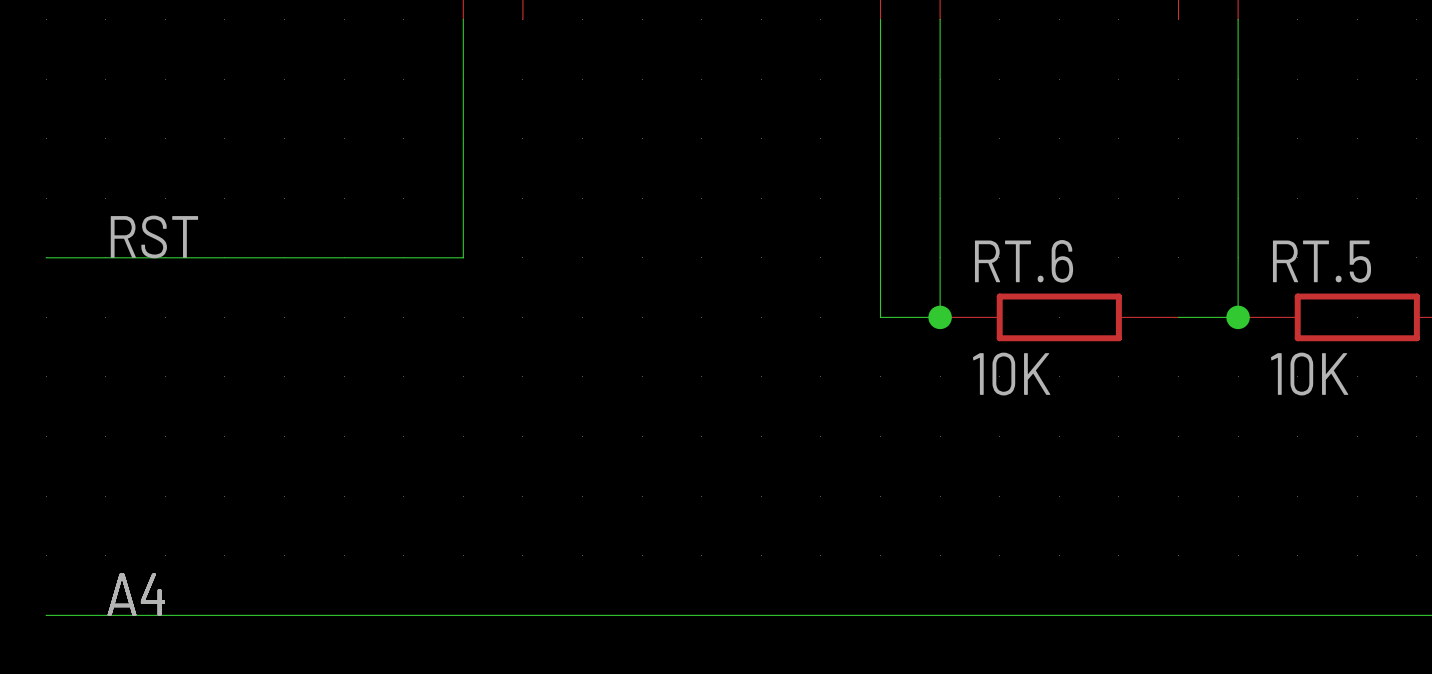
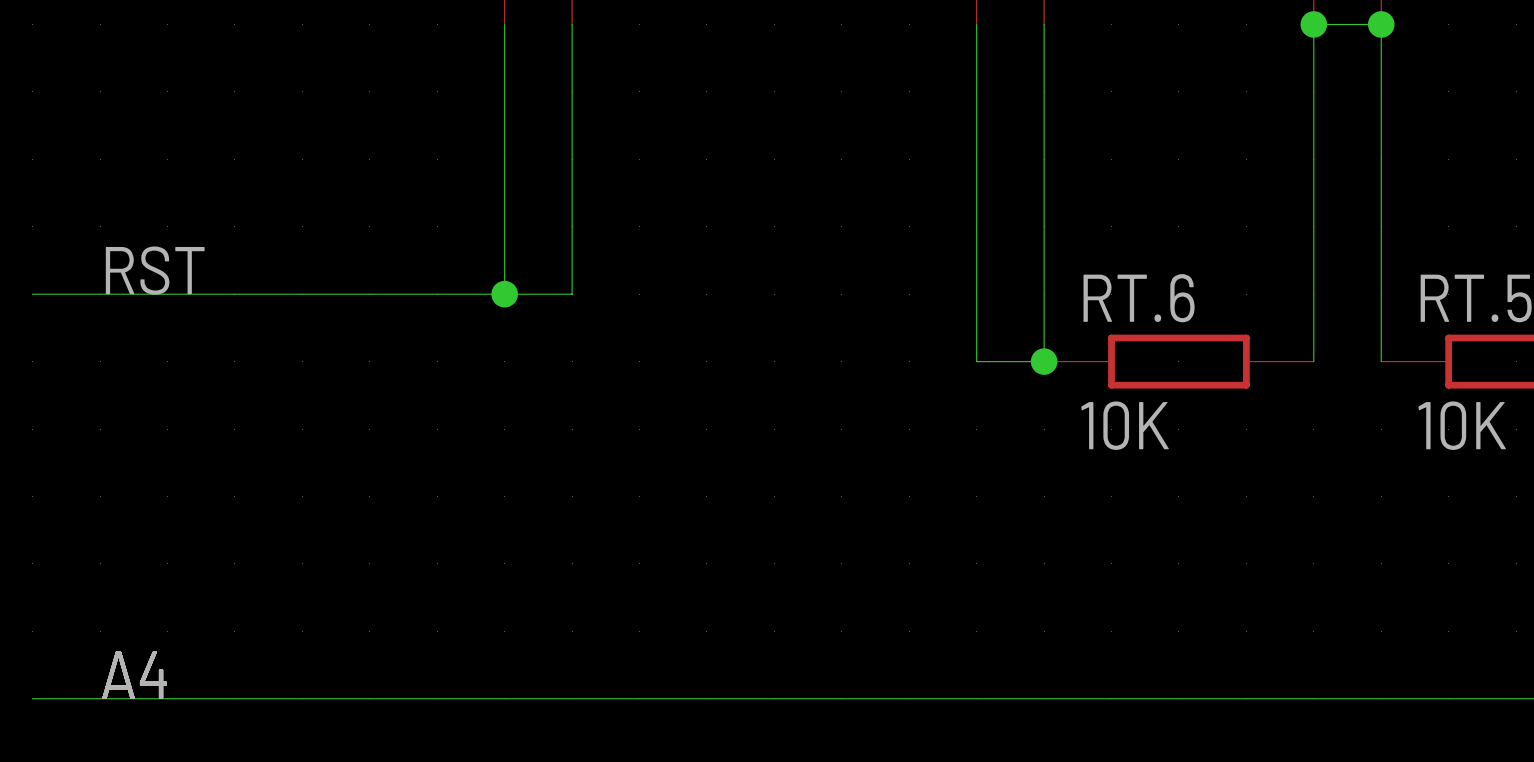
wire: none -> (572, 24) (572, 294) (504, 294)
junction: none -> (1313, 24)
junction: none -> (1381, 24)
junction: none -> (504, 294)
wire: (1178, 317) (1238, 317) -> (1313, 361) (1313, 24) (1381, 24)
junction: (1238, 317) -> none

